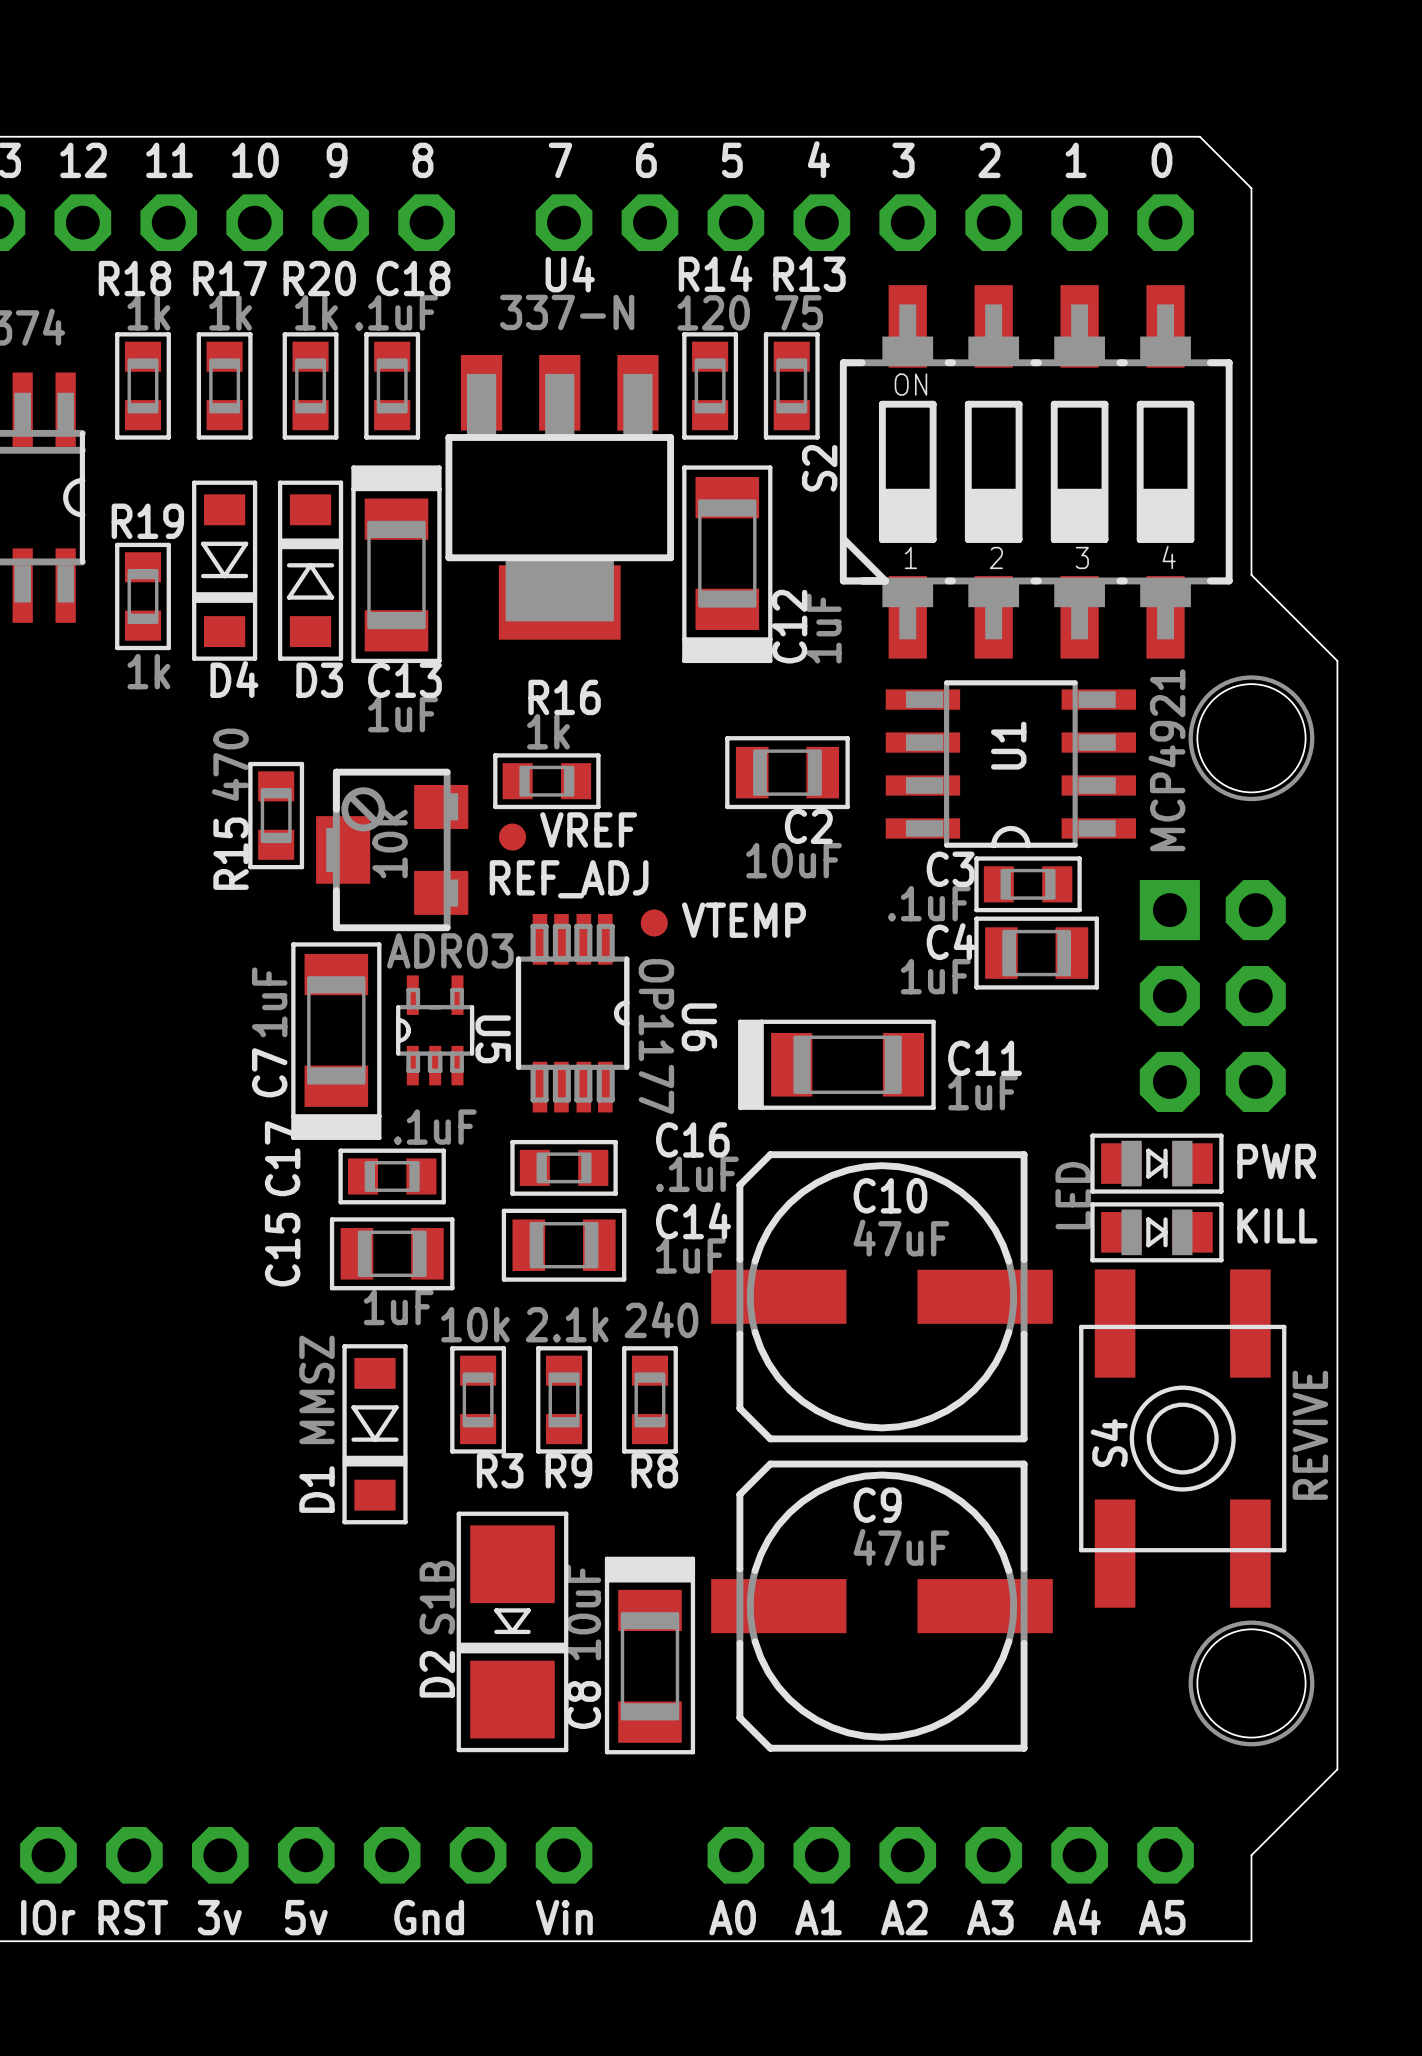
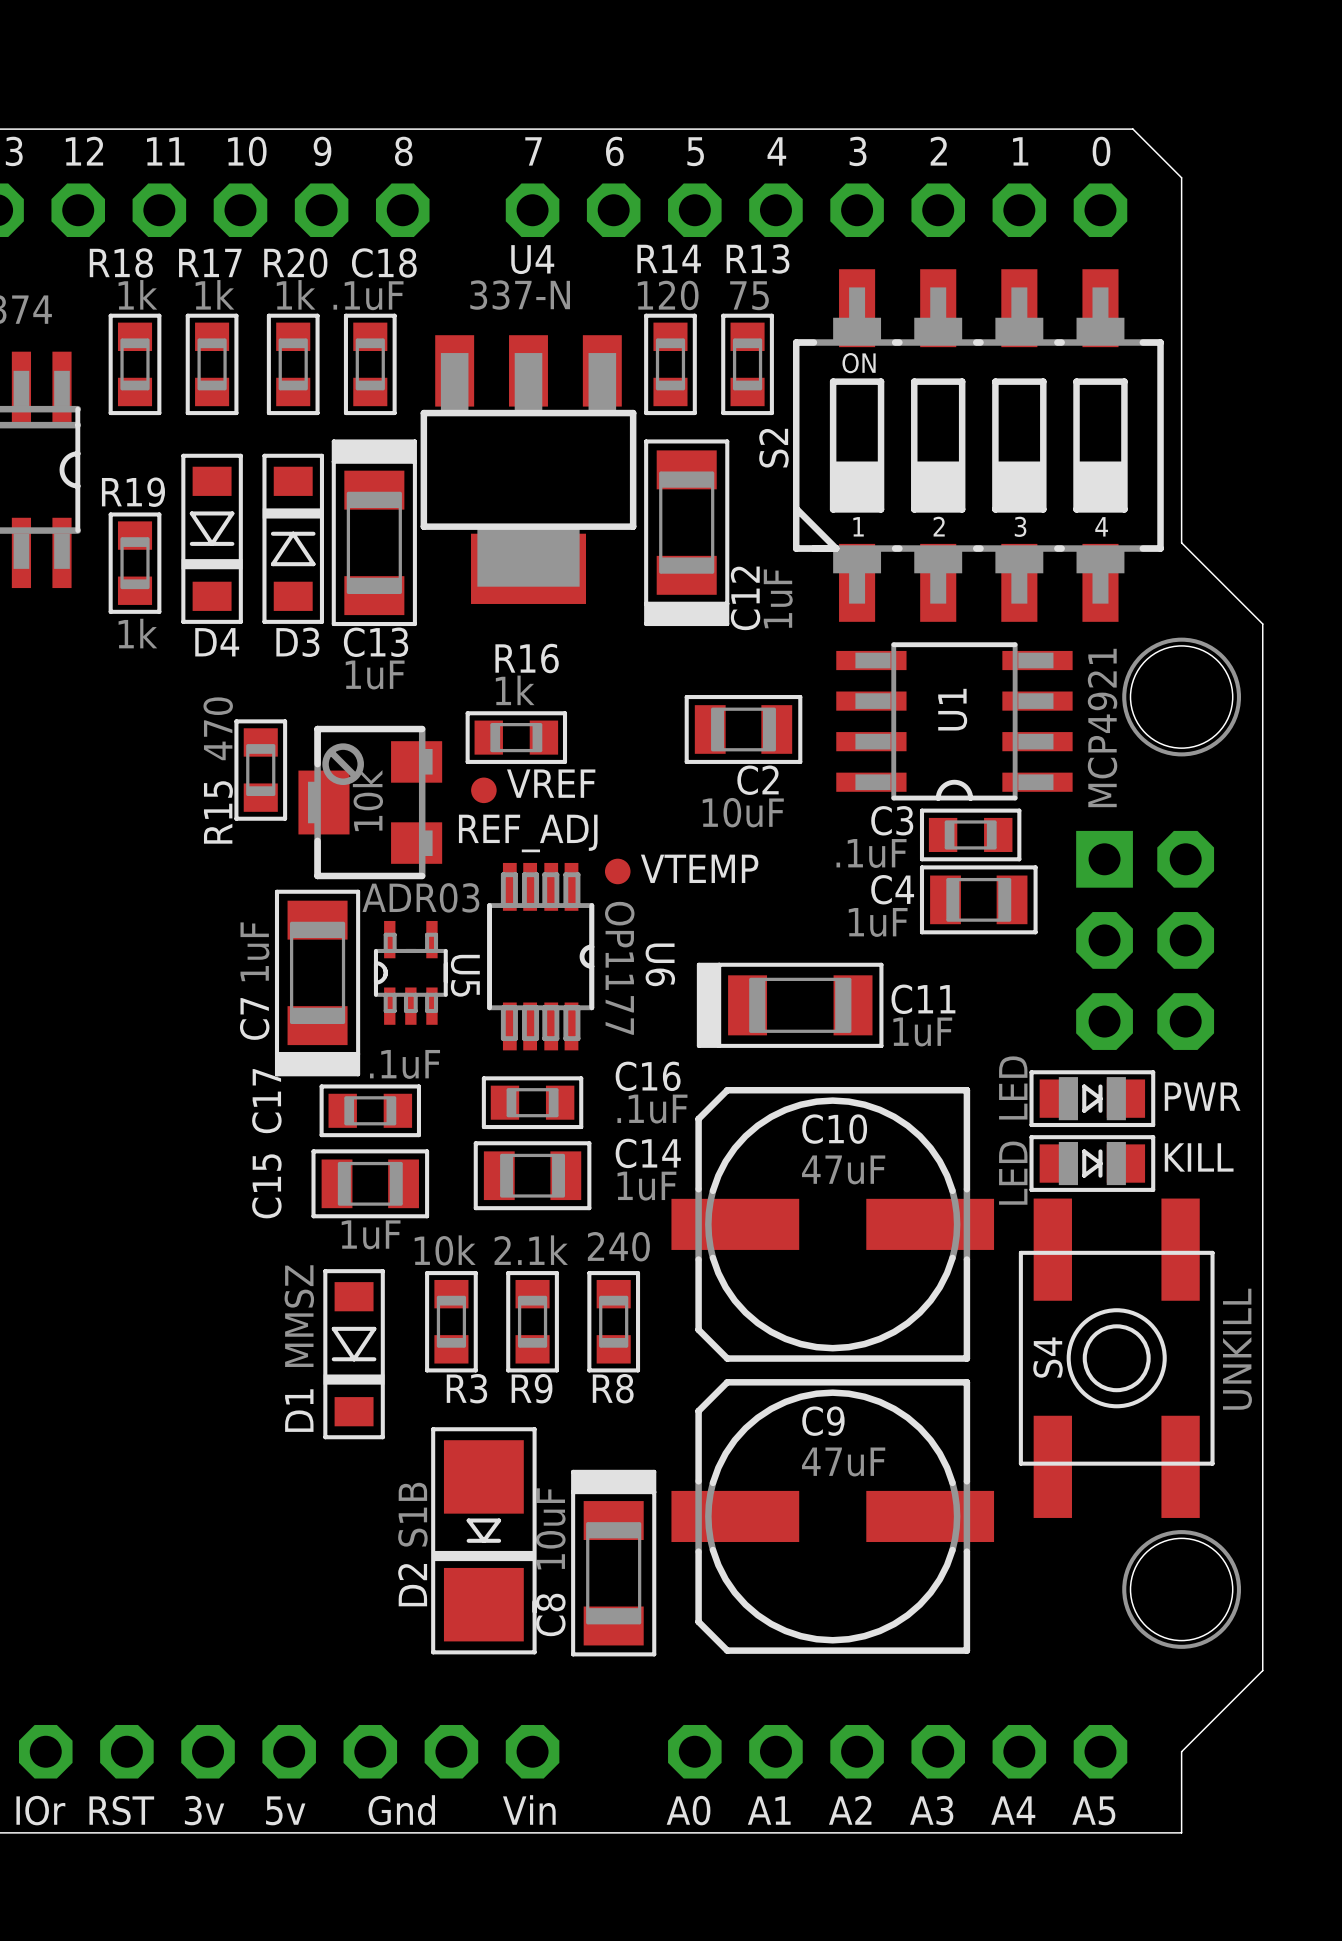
KILL value: none -> LED (1013, 1087)
PWR value position: LED (1073, 1195) -> LED (1013, 1173)
S4 value: REVIVE (1310, 1435) -> UNKILL (1237, 1349)

